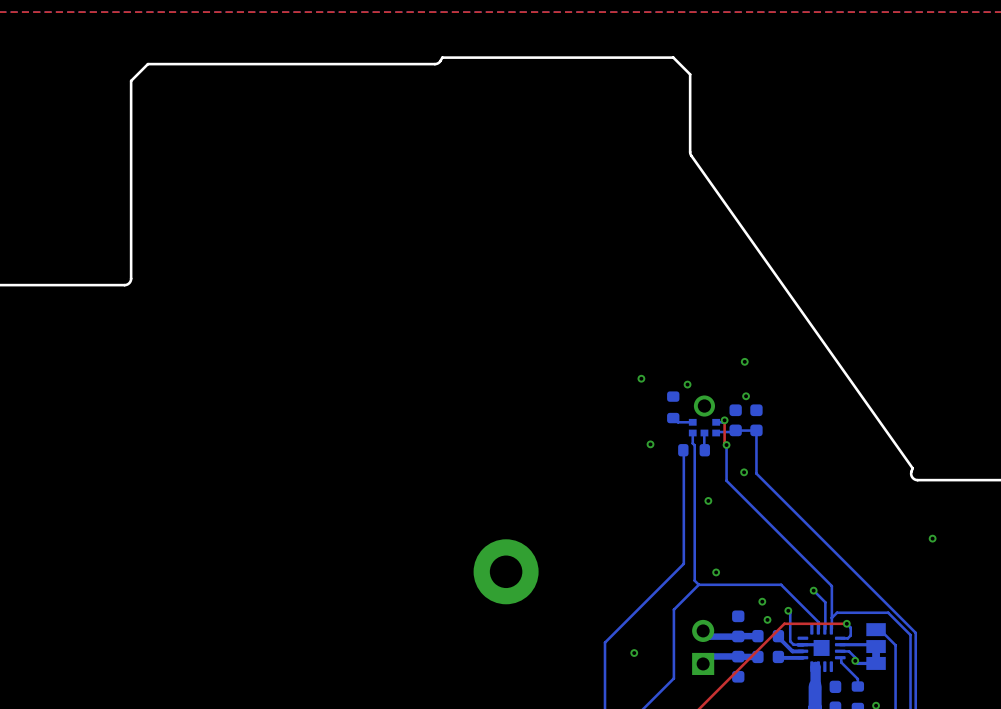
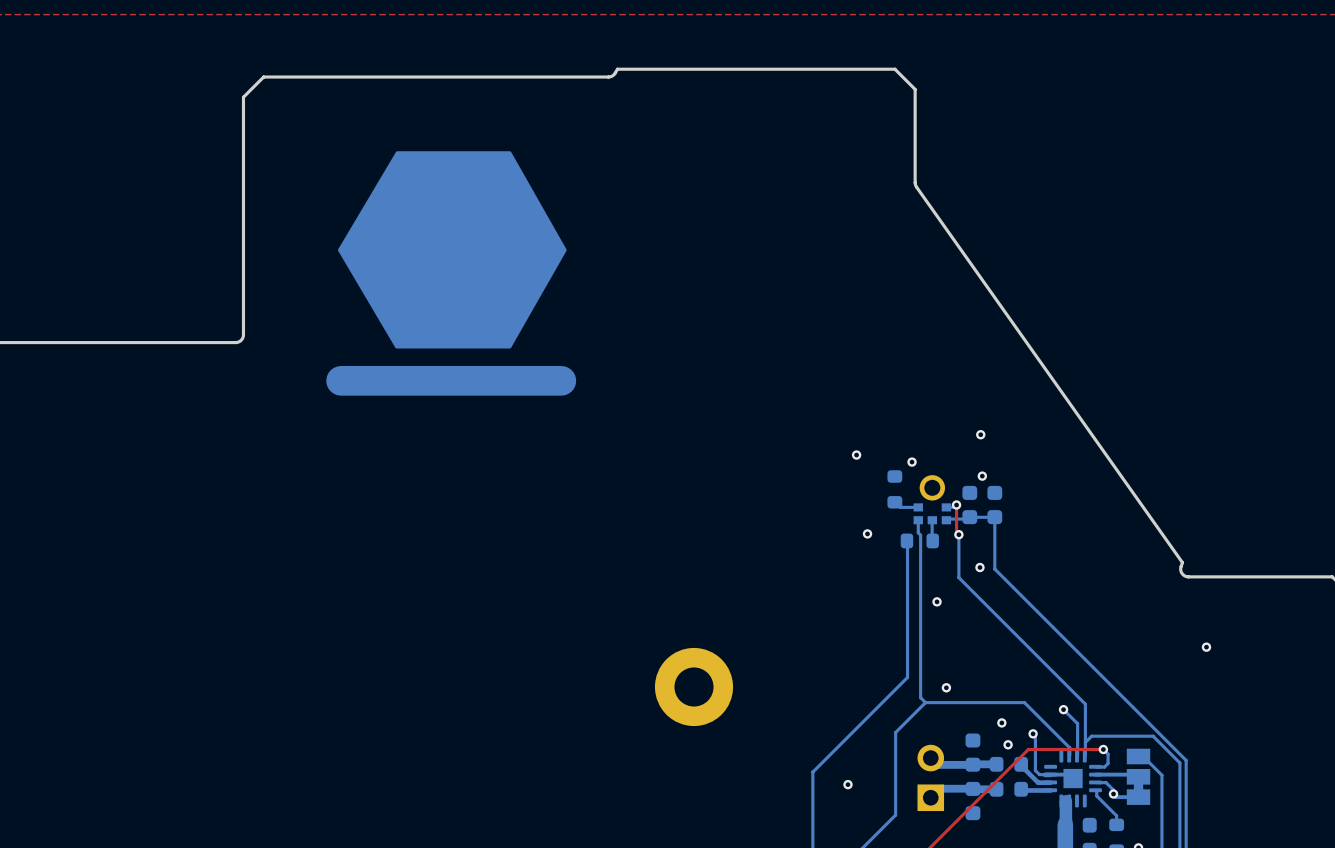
part: none -> (451, 273)

